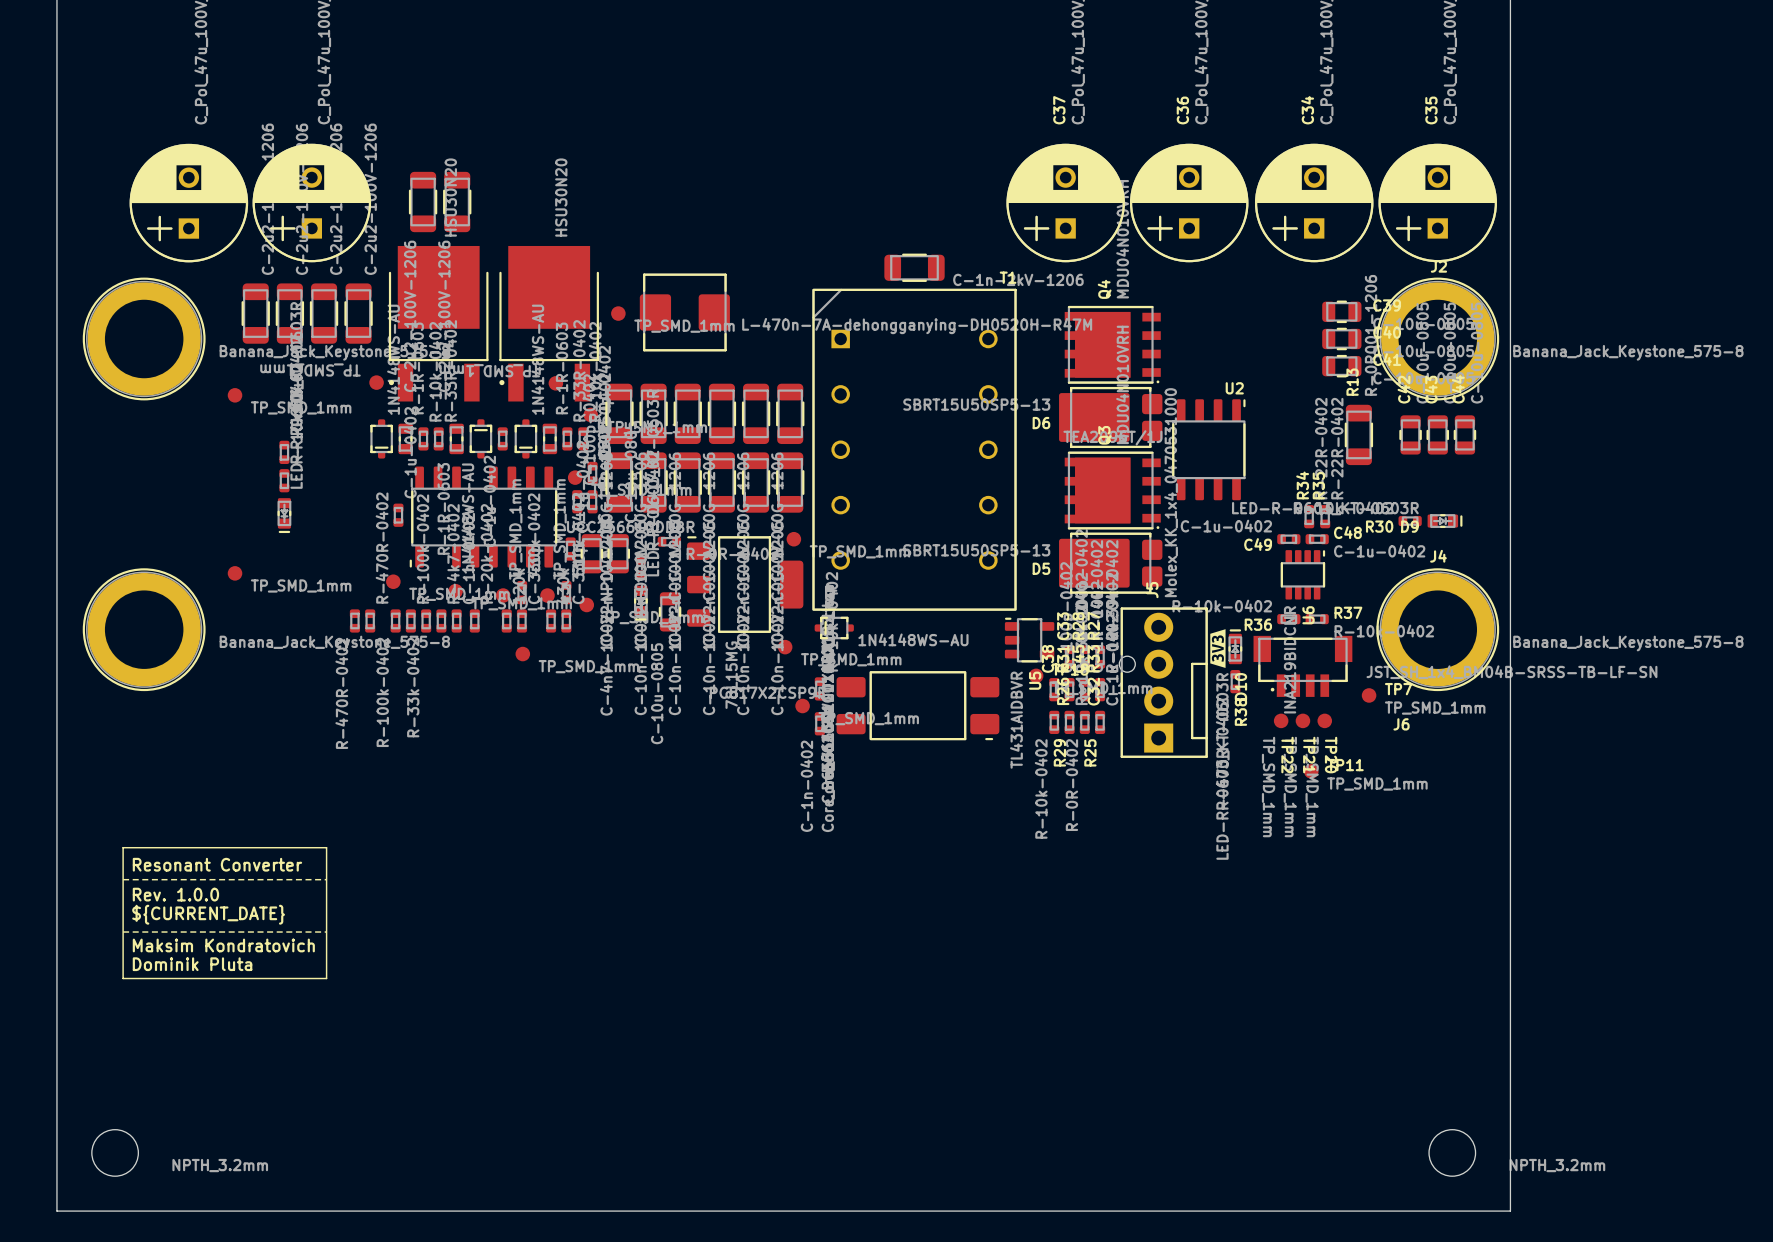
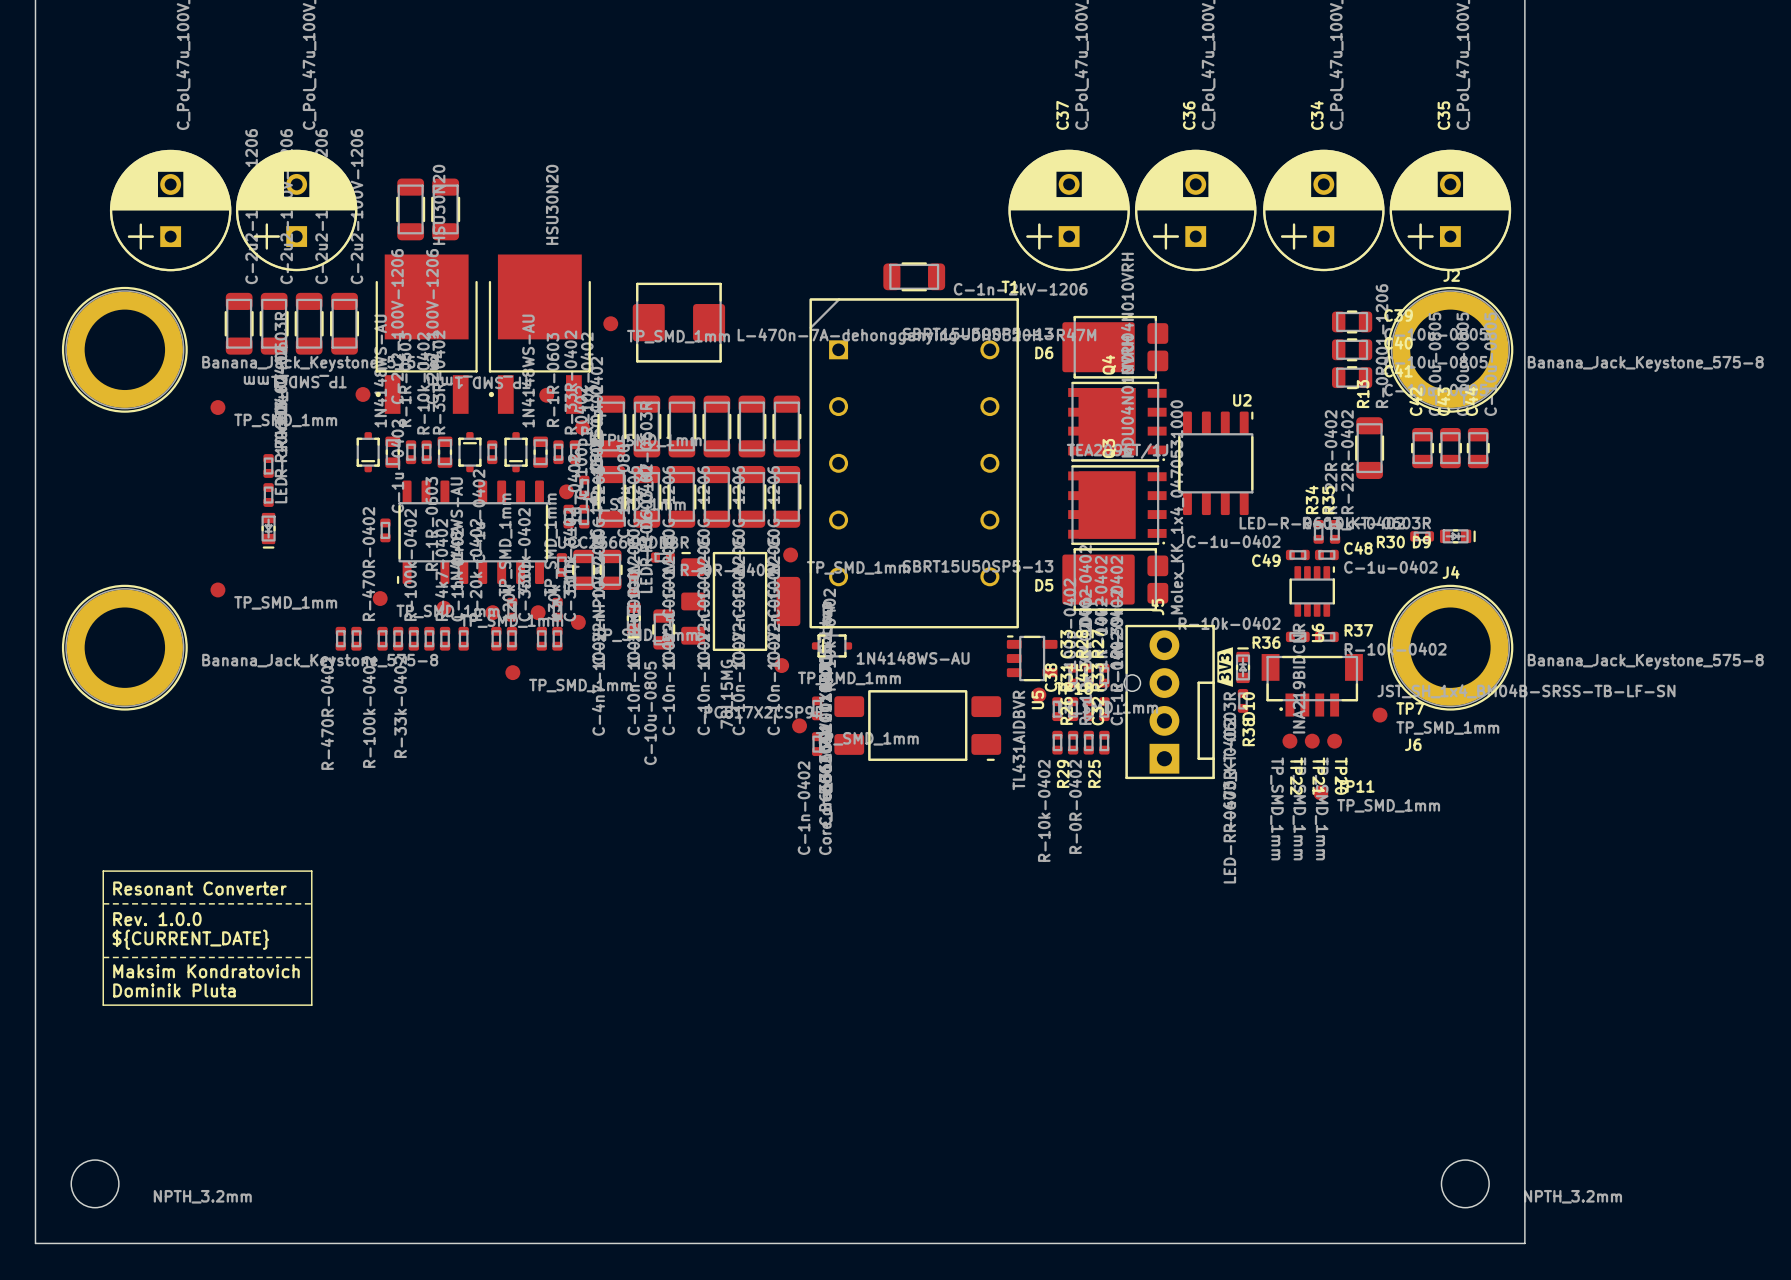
Q4 position: (1112, 344) -> (1117, 421)
D6 position: (1110, 417) -> (1115, 347)

